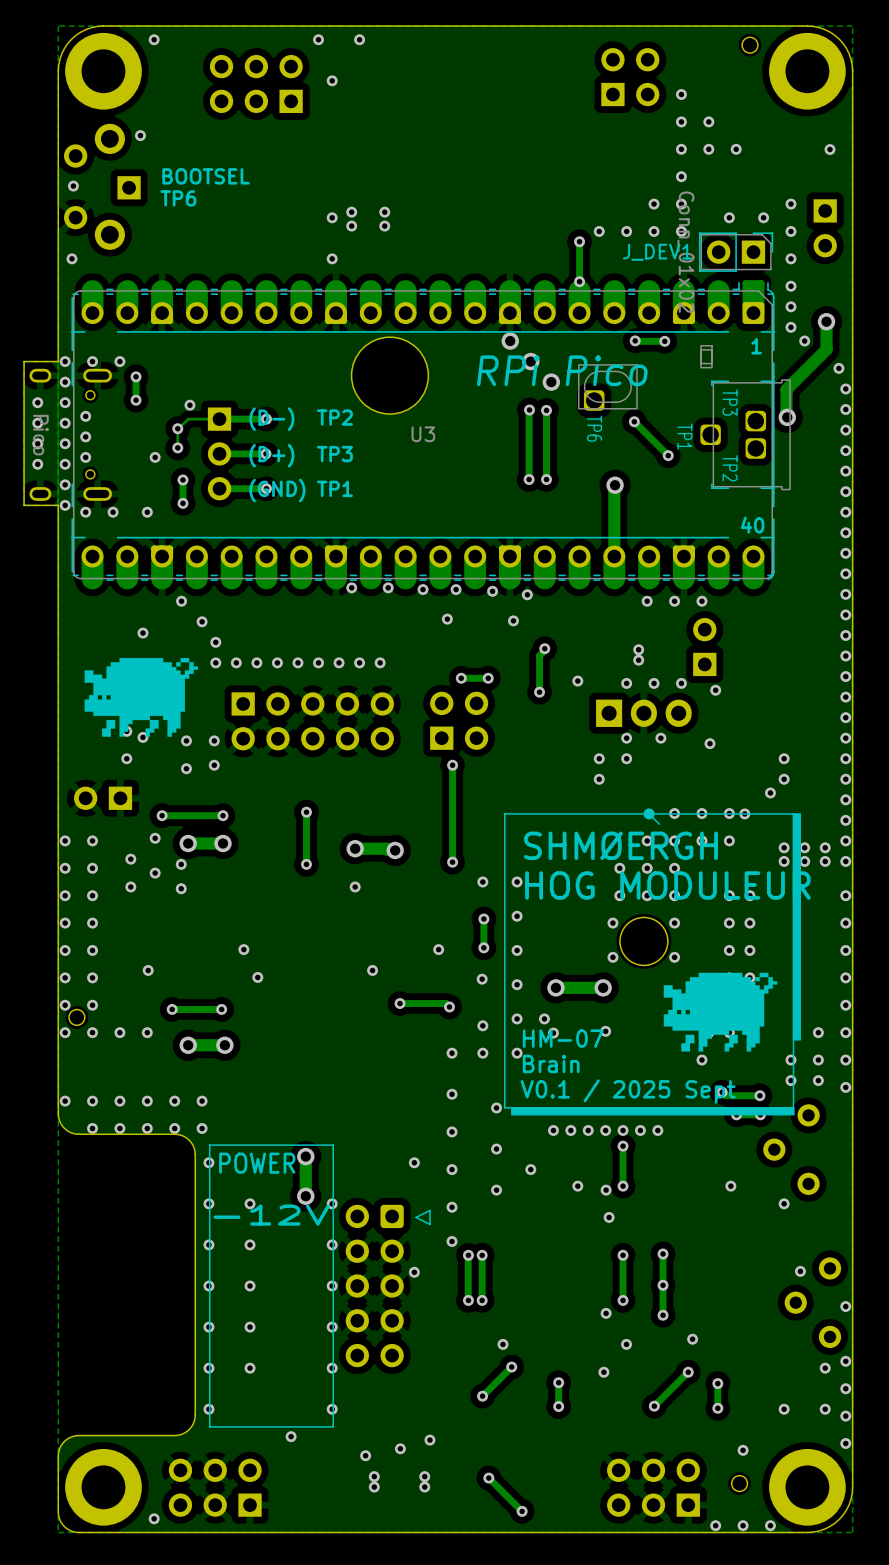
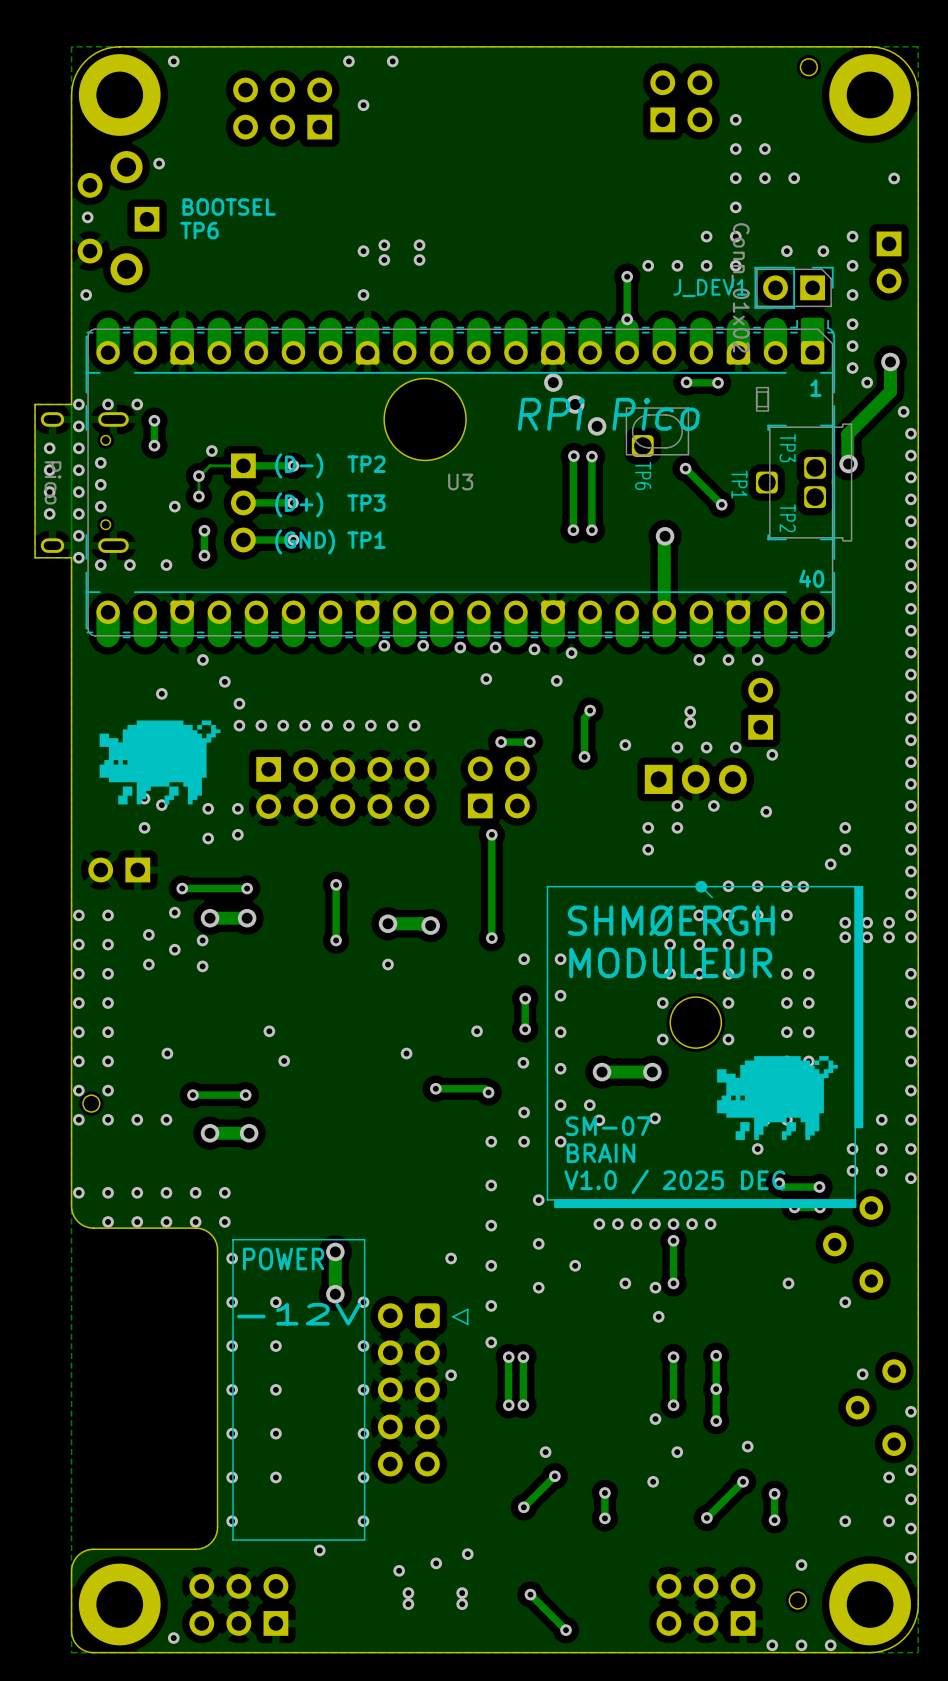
text: HOG MODULEUR (667, 885) -> MODULEUR (670, 962)
text: HM-07 (563, 1038) -> SM-07 (608, 1126)
text: Brain (551, 1063) -> BRAIN (600, 1153)
text: V0.1 / 2025 Sept (628, 1091) -> V1.0 / 2025 DEC (674, 1181)

